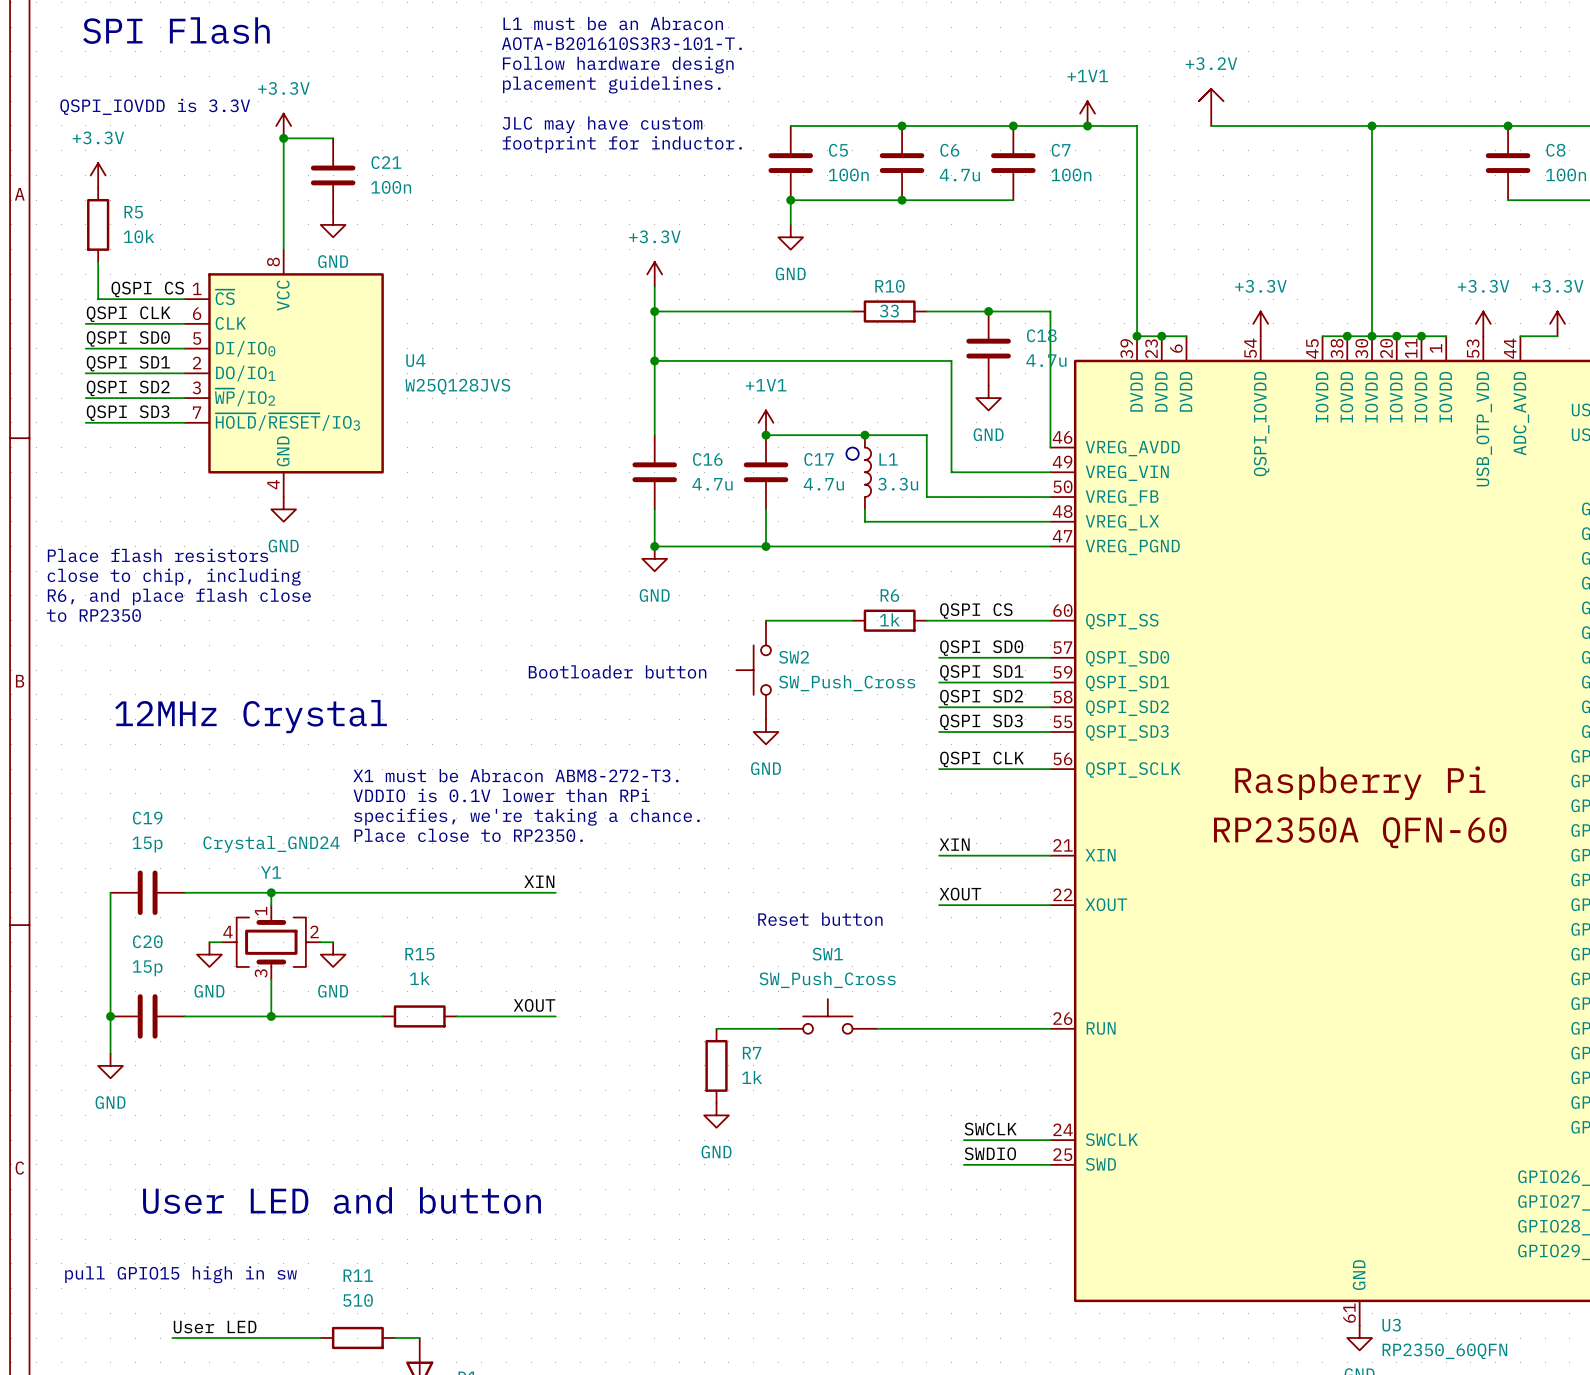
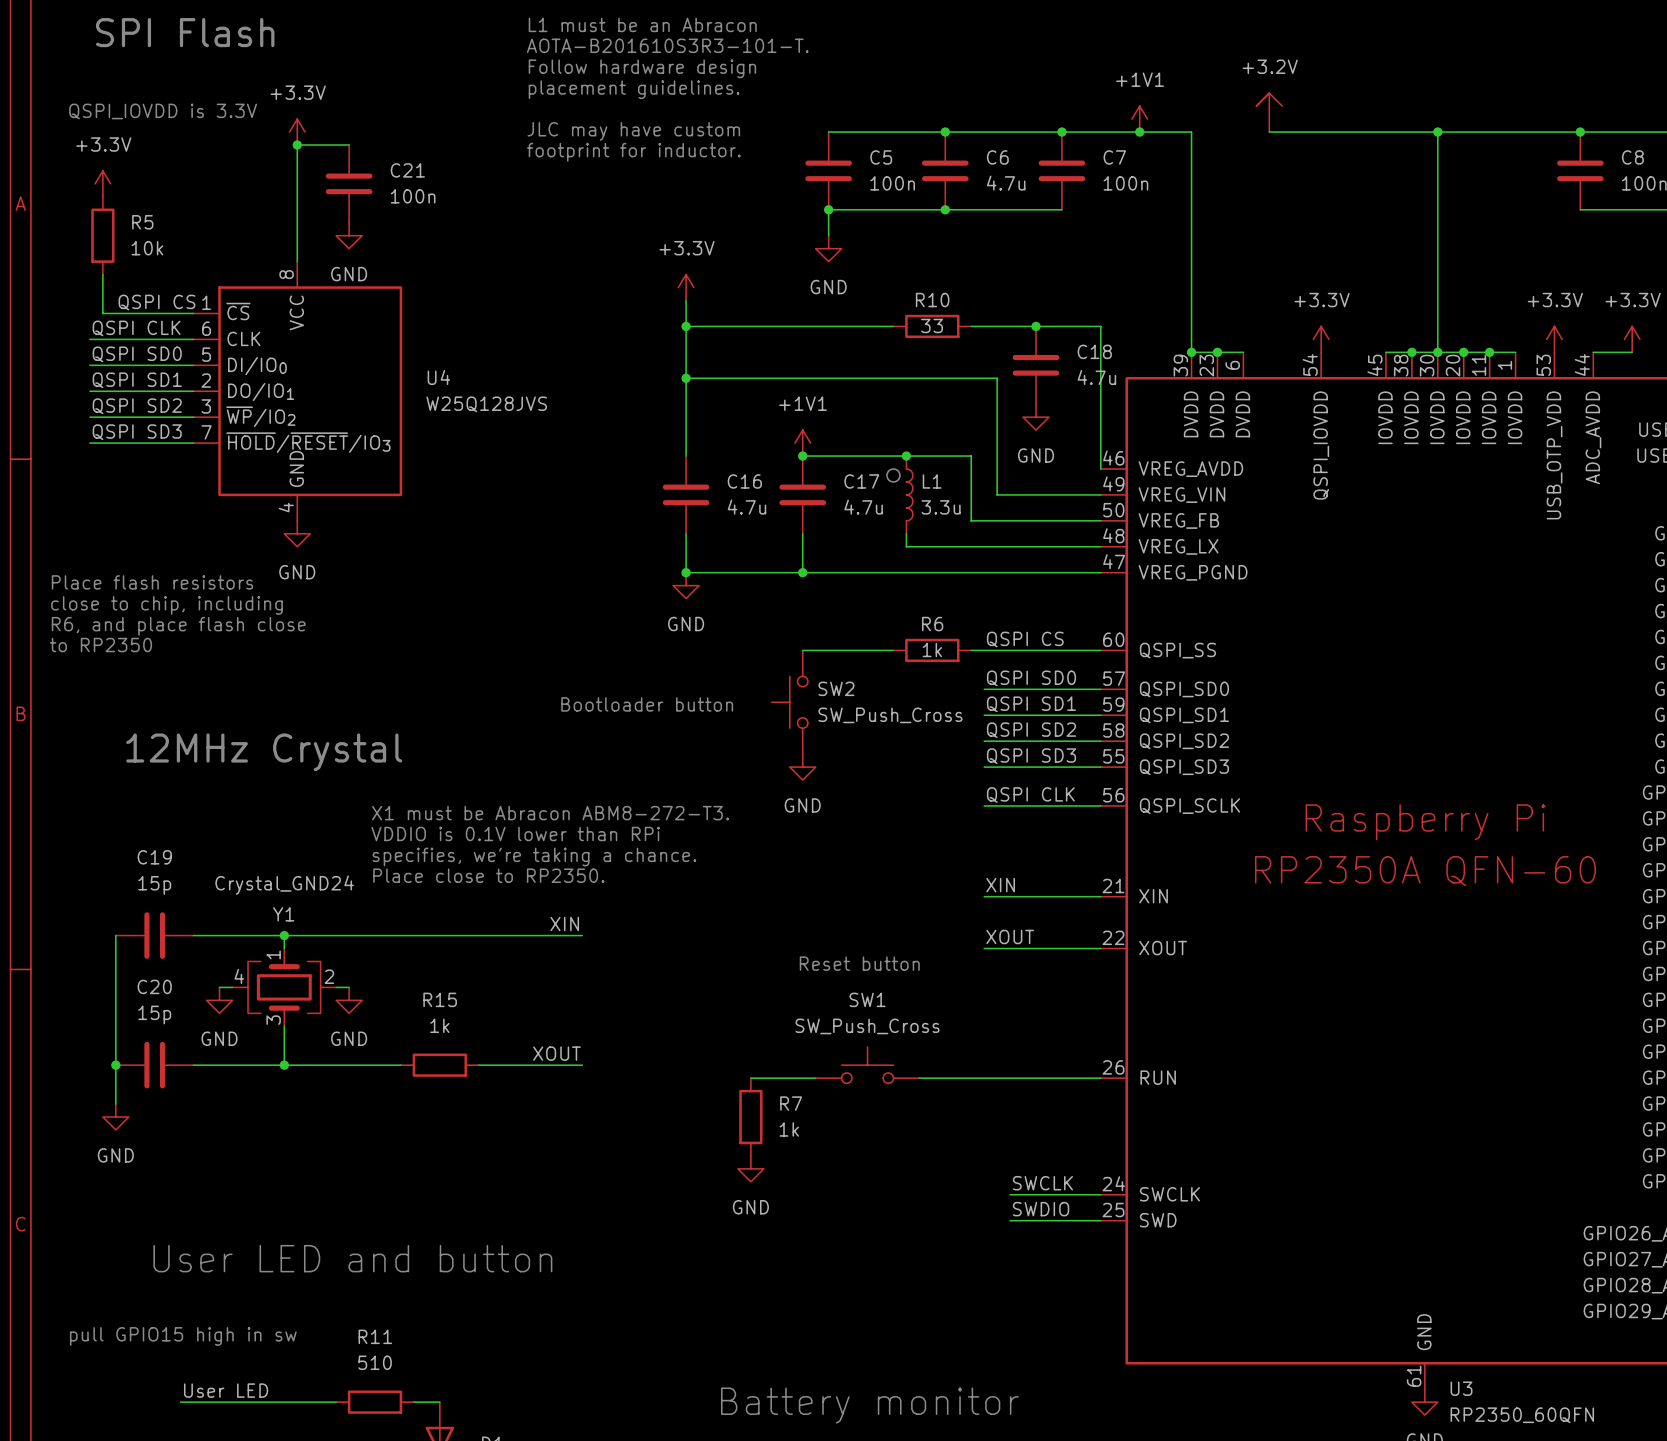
text: none -> Battery monitor (869, 1405)

